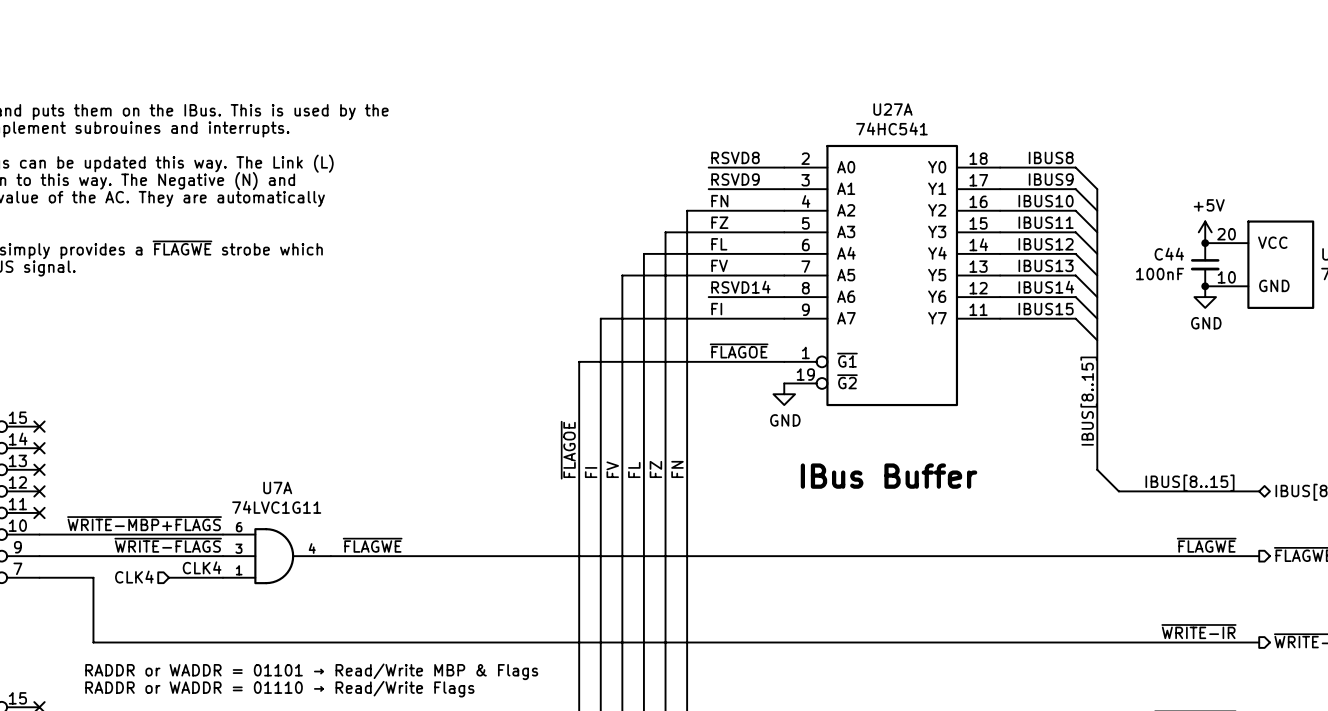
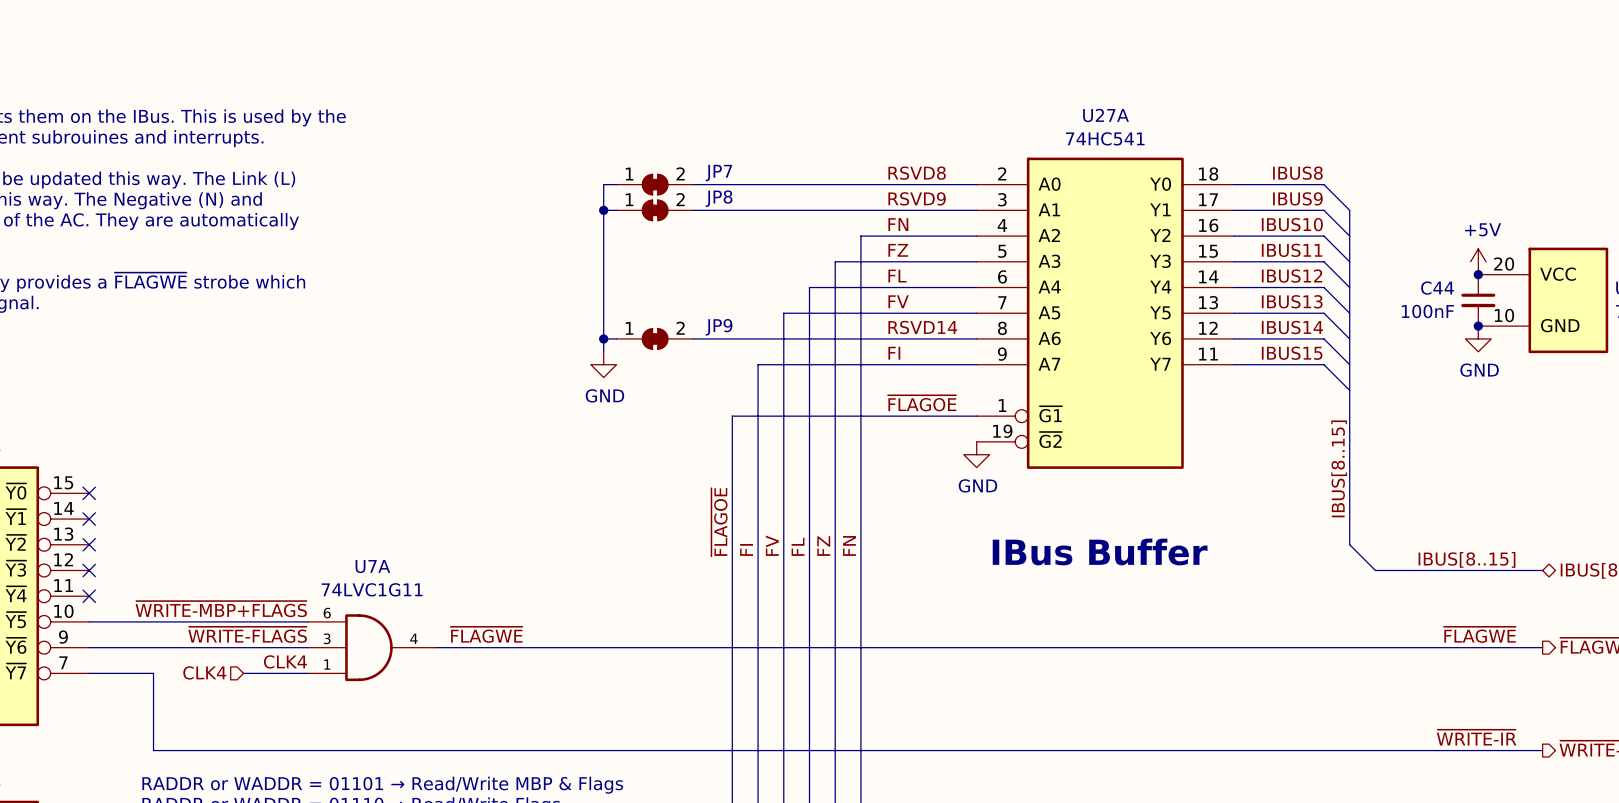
wire: none -> (616, 184) (603, 184) (603, 351)
JP7: none -> (655, 184)
wire: none -> (693, 184) (886, 184)
wire: none -> (603, 210) (616, 210)
junction: none -> (603, 210)
JP8: none -> (655, 210)
wire: none -> (693, 210) (886, 210)
wire: none -> (603, 338) (616, 338)
junction: none -> (603, 338)
JP9: none -> (655, 338)
wire: none -> (693, 338) (886, 338)
power symbol: none -> GND (603, 364)

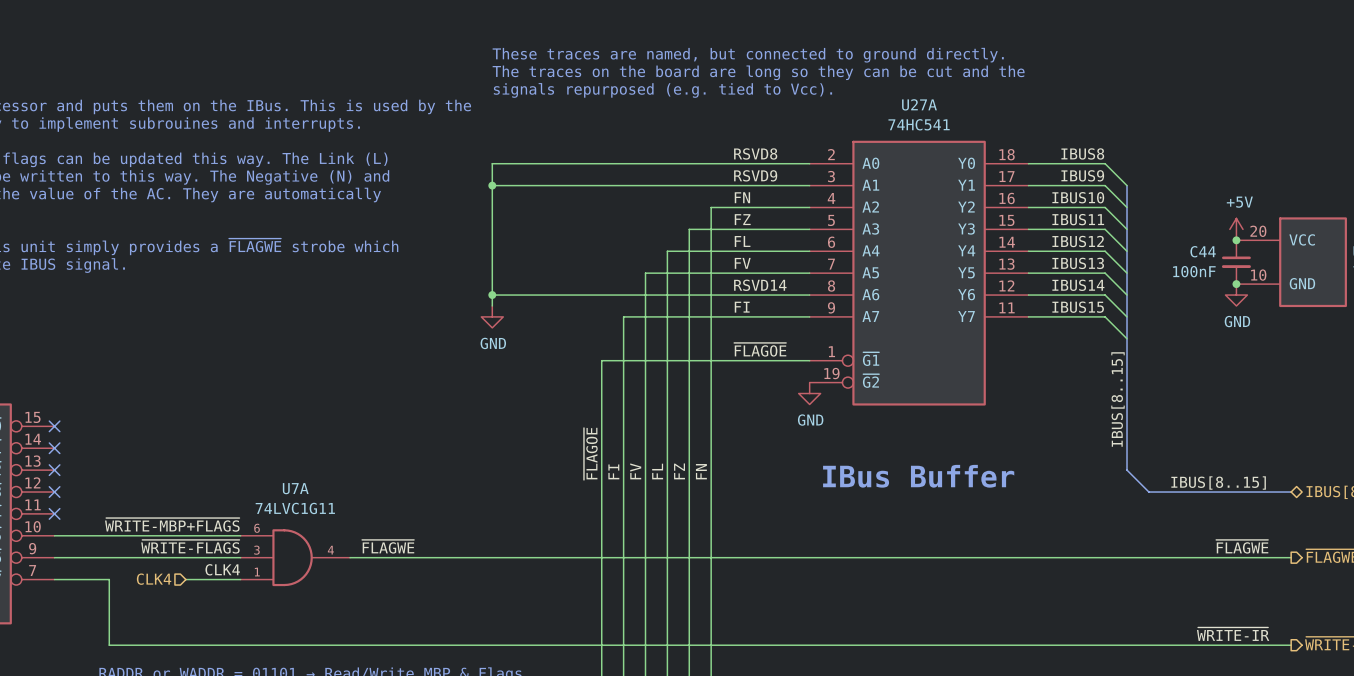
text: none -> These traces are named, but connected to ground directly. (748, 55)
text: none -> The traces on the board are long so they can be cut and the (758, 72)
text: none -> signals repurposed (e.g. tied to Vcc). (662, 90)
JP7: (655, 184) -> none
JP8: (655, 210) -> none
JP9: (655, 338) -> none

